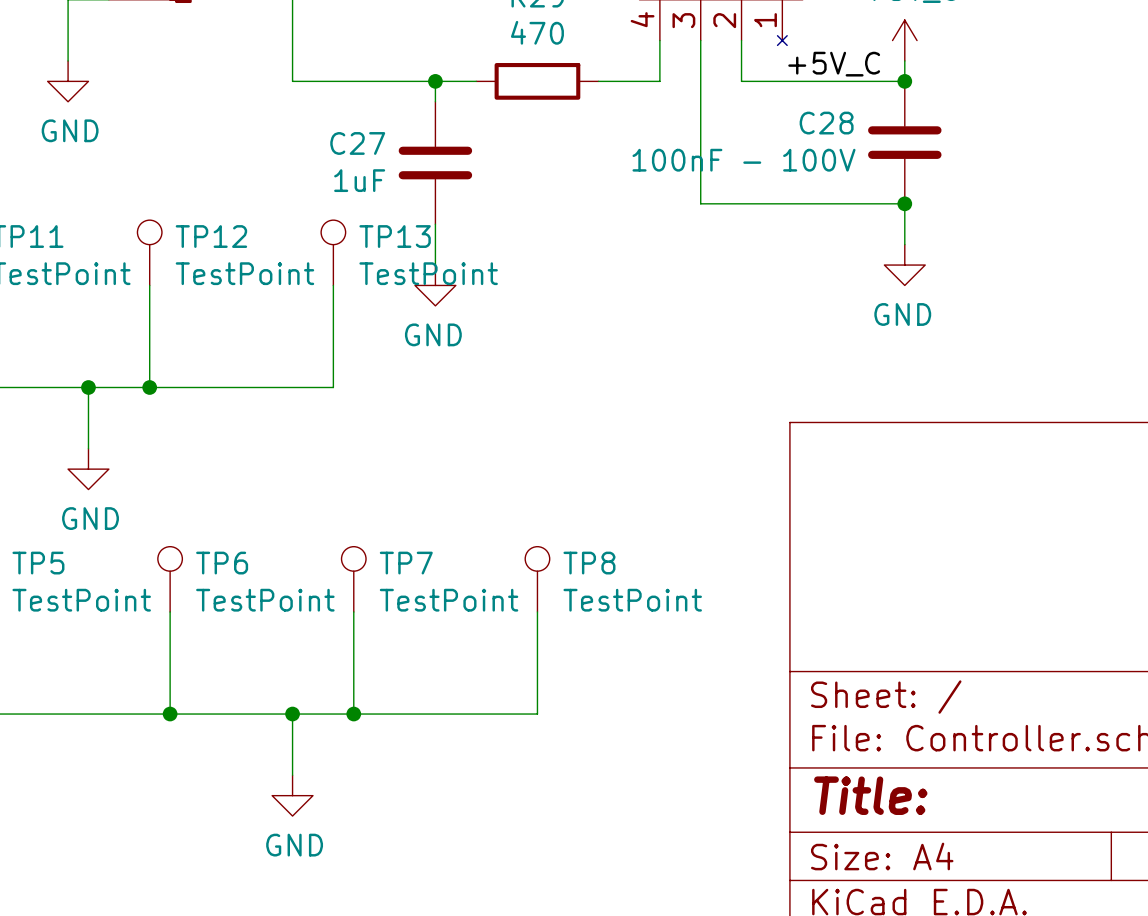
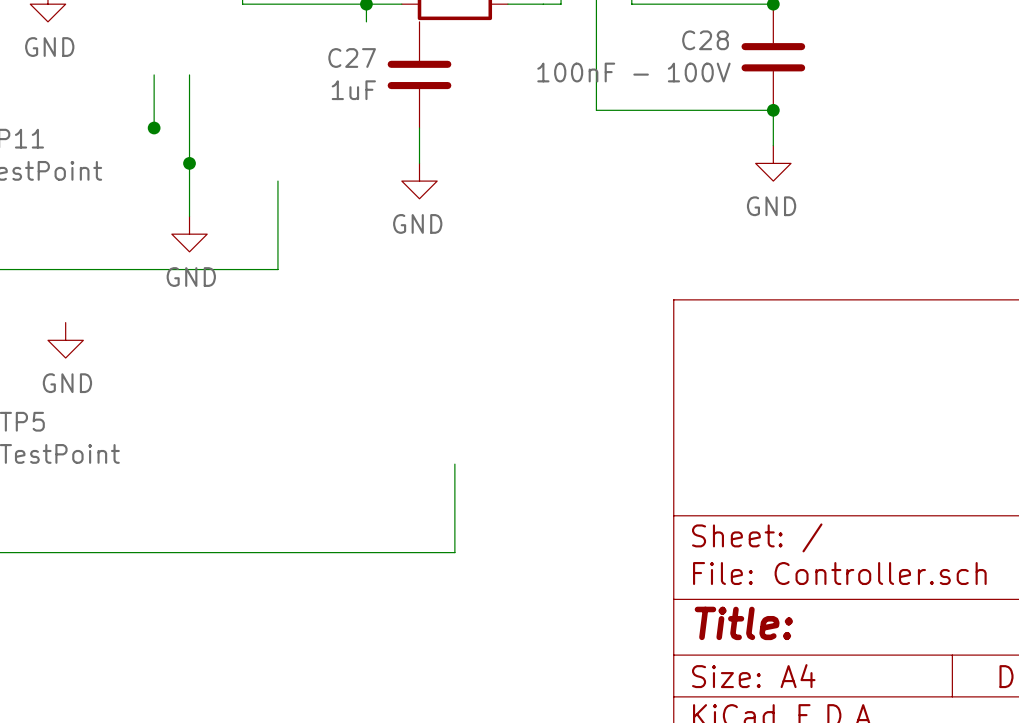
wire: none -> (189, 74) (189, 216)
C27 position: (435, 163) -> (419, 74)
junction: none -> (154, 128)
wire: (435, 224) (435, 265) -> (419, 128) (419, 163)
TP12: TestPoint (149, 252) -> none
TP13: TestPoint (333, 252) -> none
junction: none -> (189, 163)
wire: (149, 285) (149, 387) -> none
power symbol position: GND (435, 285) -> GND (419, 181)
power symbol: none -> GND (189, 234)
wire: (88, 387) (88, 448) -> (154, 74) (154, 128)
junction: (88, 387) -> none
junction: (149, 387) -> none
TP6: TestPoint (170, 579) -> none
TP7: TestPoint (353, 579) -> none
TP8: TestPoint (537, 579) -> none
wire: (170, 611) (170, 714) -> none
wire: (353, 611) (353, 714) -> none
junction: (170, 714) -> none
wire: (292, 714) (292, 775) -> none
junction: (292, 714) -> none
junction: (353, 714) -> none
power symbol: GND (292, 795) -> none

